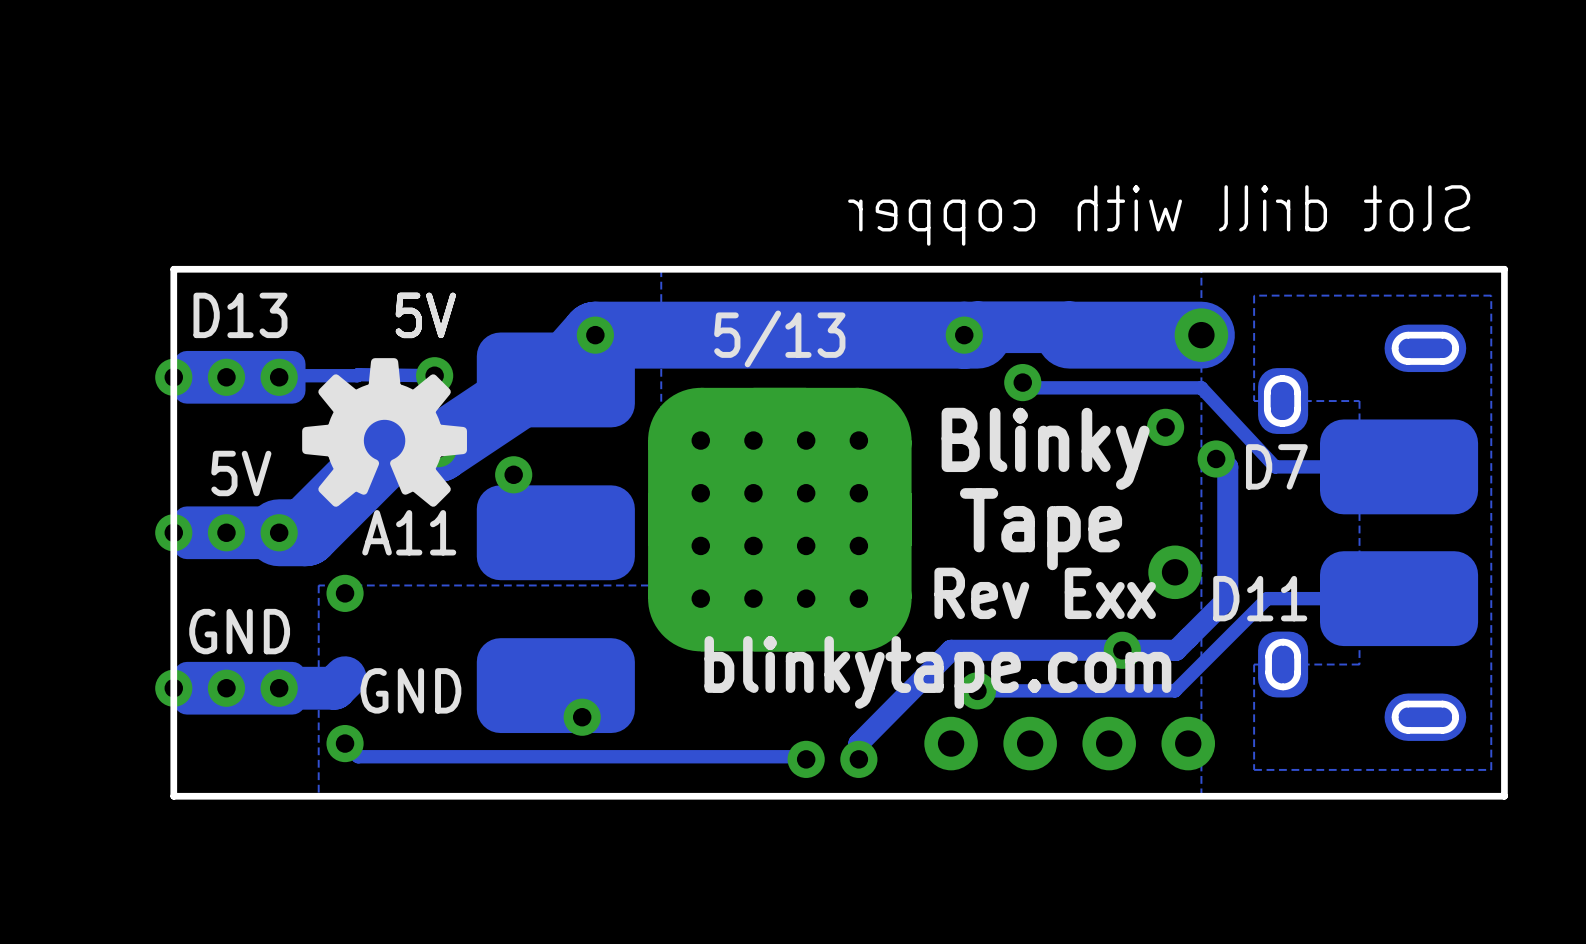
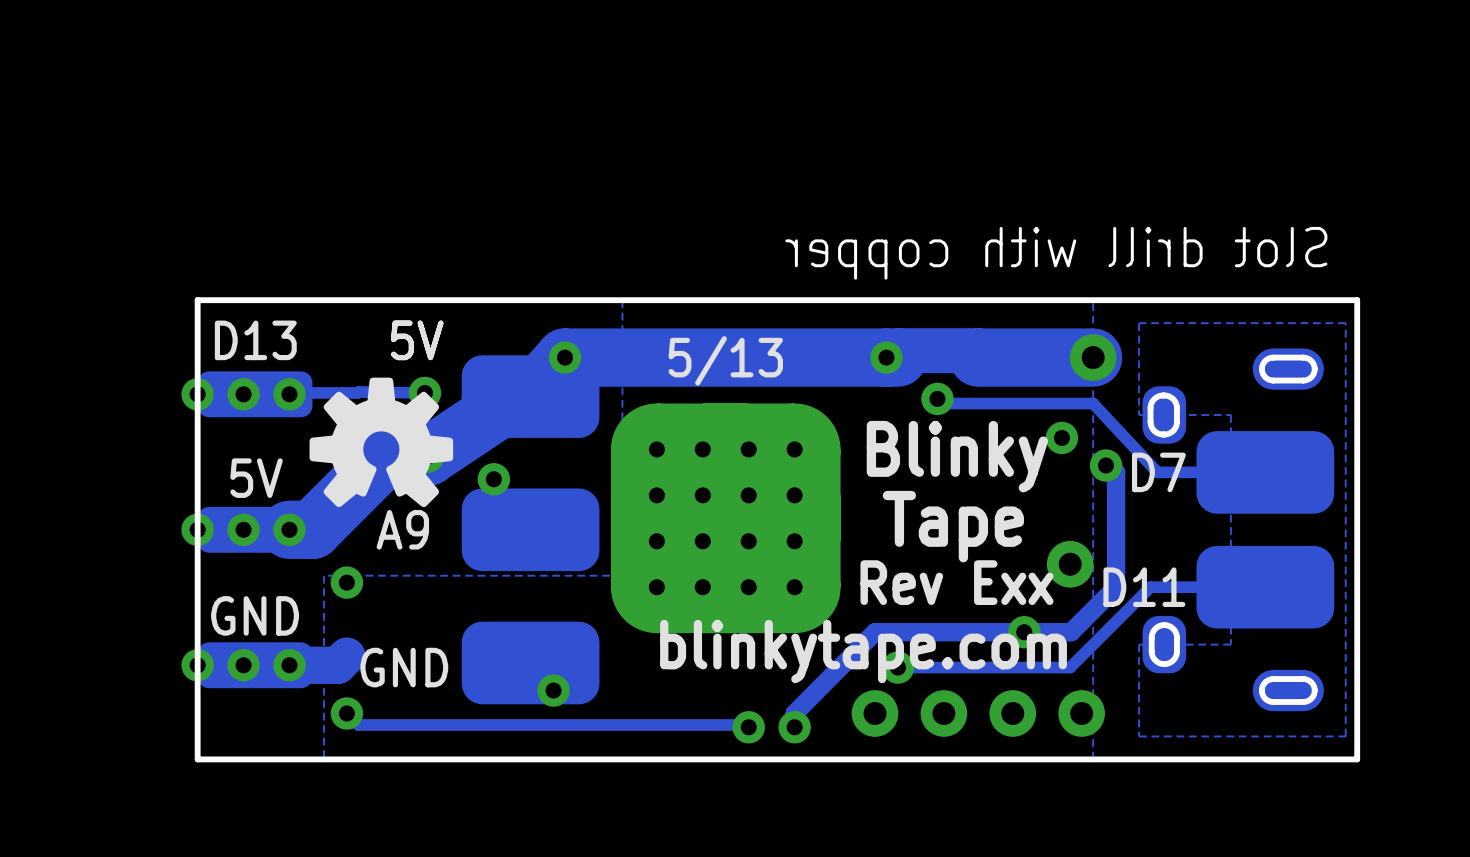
text: A11 (409, 532) -> A9 (402, 529)

